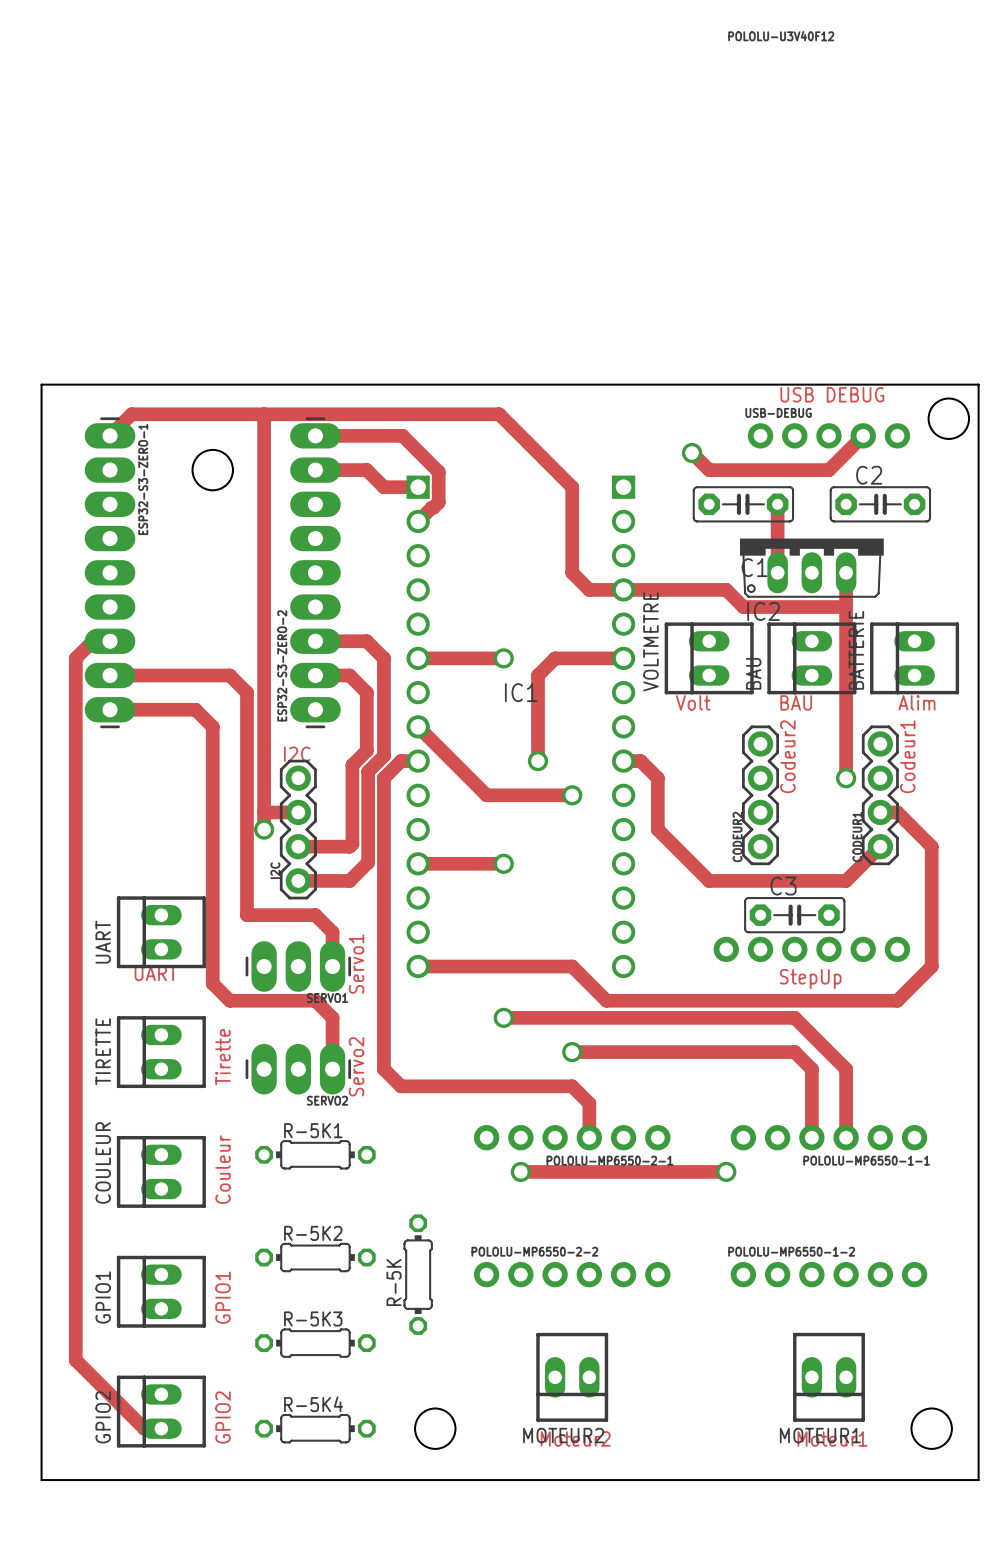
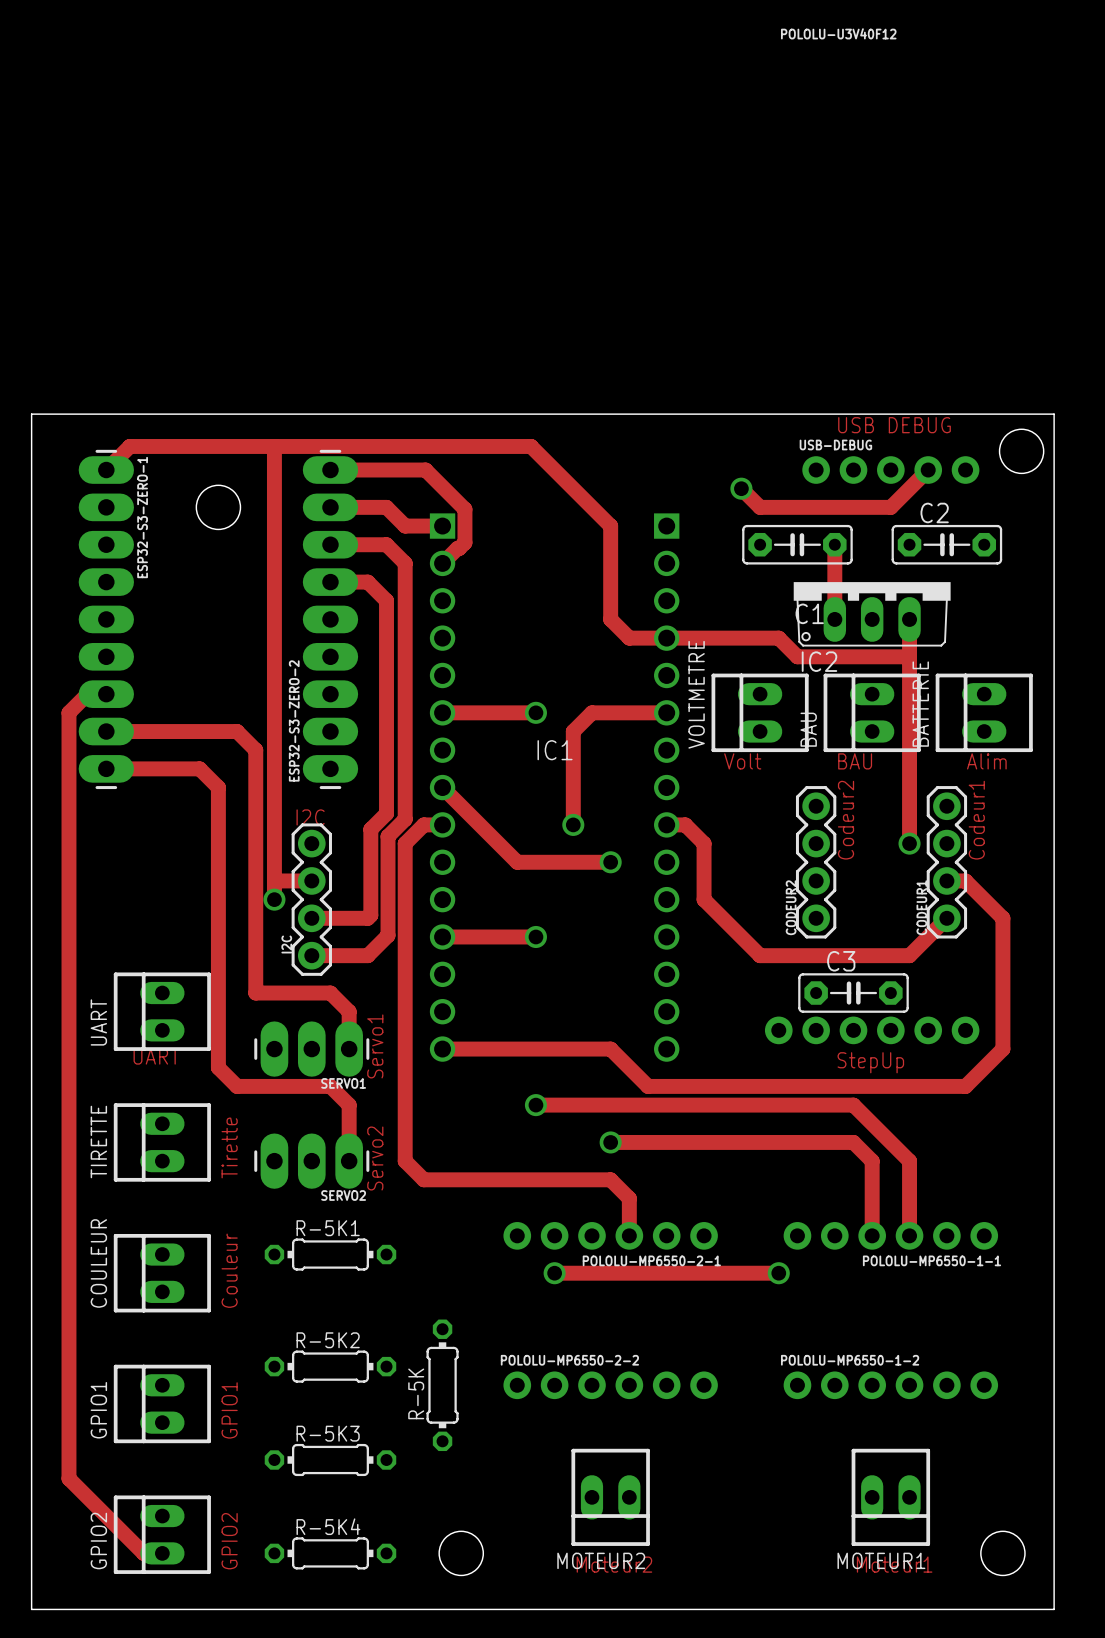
track: (315, 641) (366, 641) (383, 658) -> (330, 544) (386, 544) (405, 563) (405, 712)
track: (315, 675) (349, 675) (366, 692) -> (330, 582) (367, 582) (386, 600) (386, 750)

